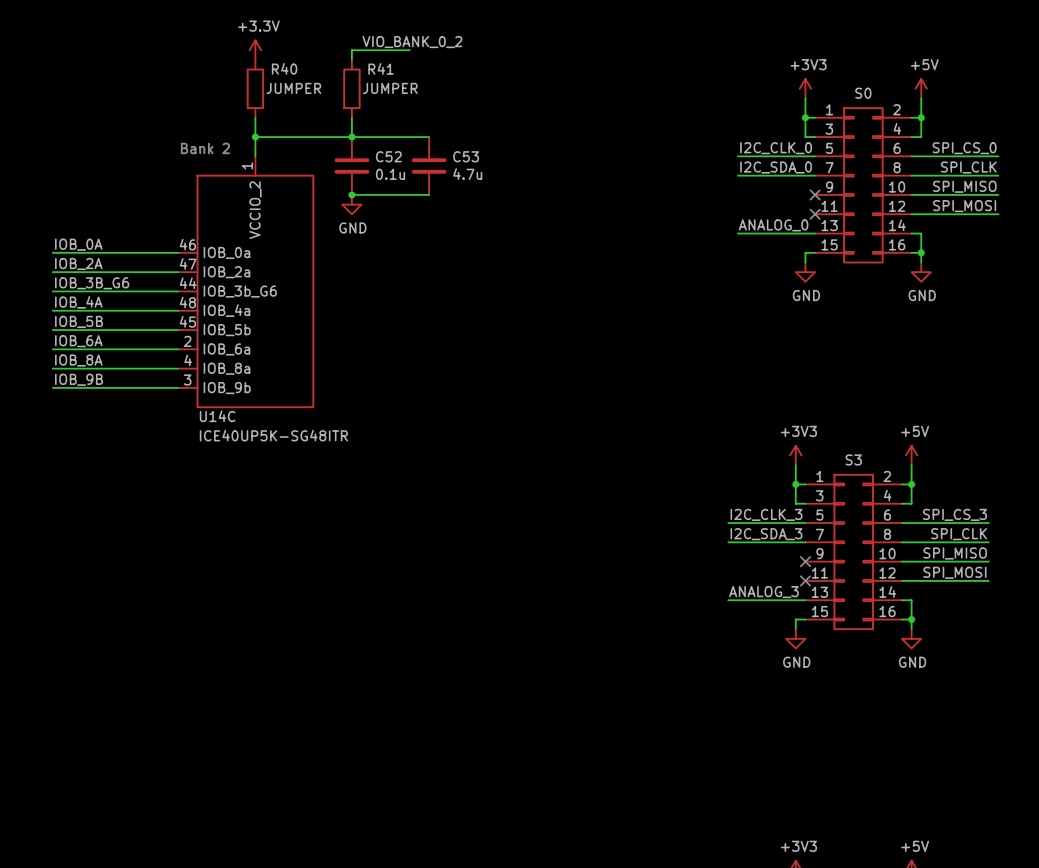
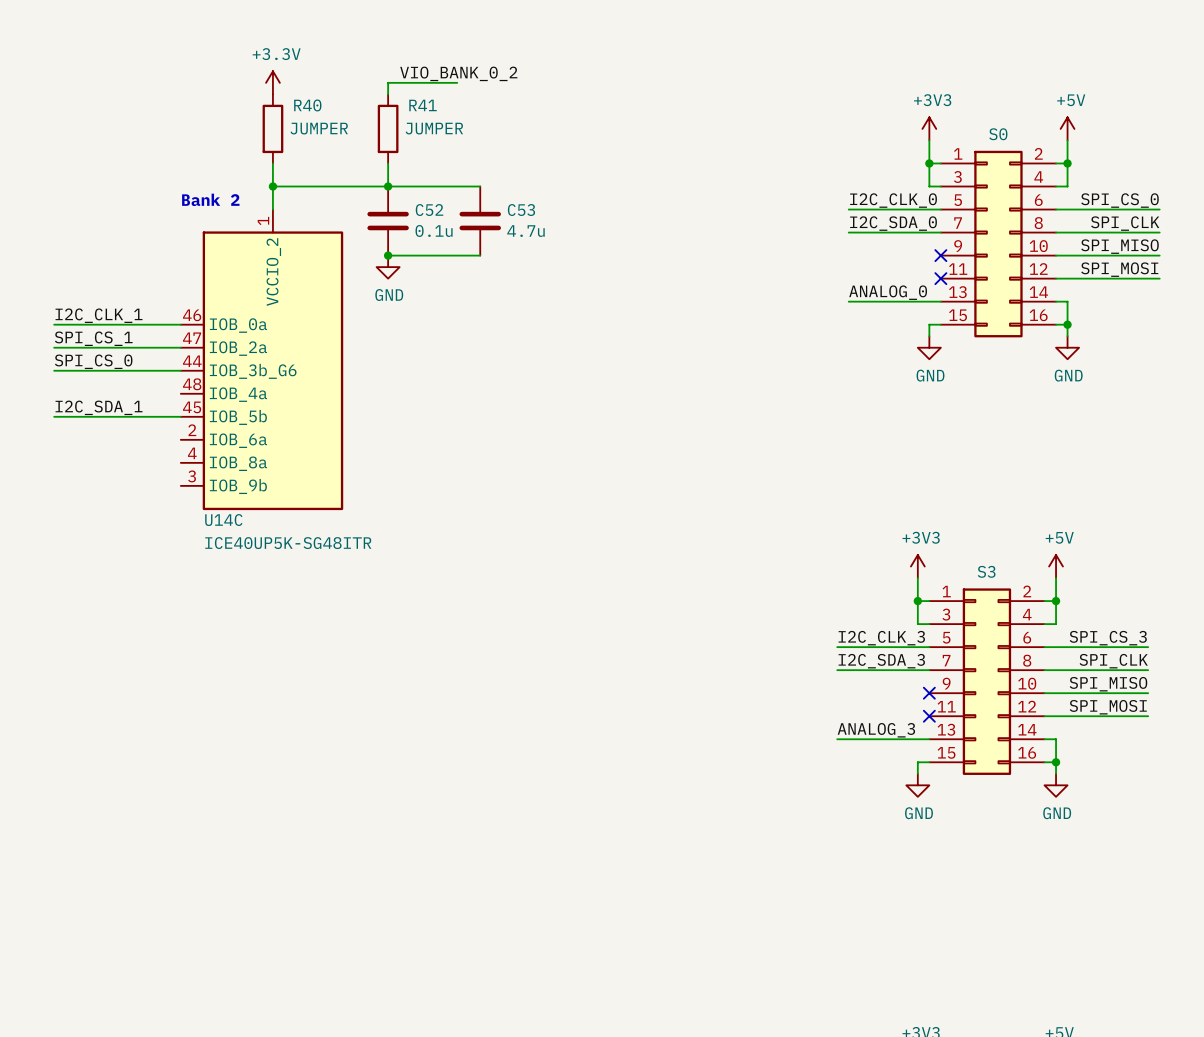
label: IOB_0A (78, 244) -> none
label: none -> I2C_CLK_1 (99, 315)
wire: (52, 252) (72, 252) -> none
label: IOB_2A (78, 263) -> none
label: none -> SPI_CS_1 (93, 338)
wire: (52, 272) (72, 272) -> none
label: IOB_3B_G6 (92, 283) -> none
label: none -> SPI_CS_0 (93, 361)
wire: (52, 291) (72, 291) -> none
label: IOB_4A (78, 302) -> none
wire: (52, 310) (178, 310) -> none
label: IOB_5B (79, 321) -> none
label: none -> I2C_SDA_1 (99, 407)
wire: (52, 330) (72, 330) -> none
label: IOB_6A (78, 341) -> none
wire: (52, 349) (178, 349) -> none
label: IOB_8A (78, 360) -> none
wire: (52, 368) (178, 368) -> none
label: IOB_9B (79, 379) -> none
wire: (52, 387) (178, 387) -> none

